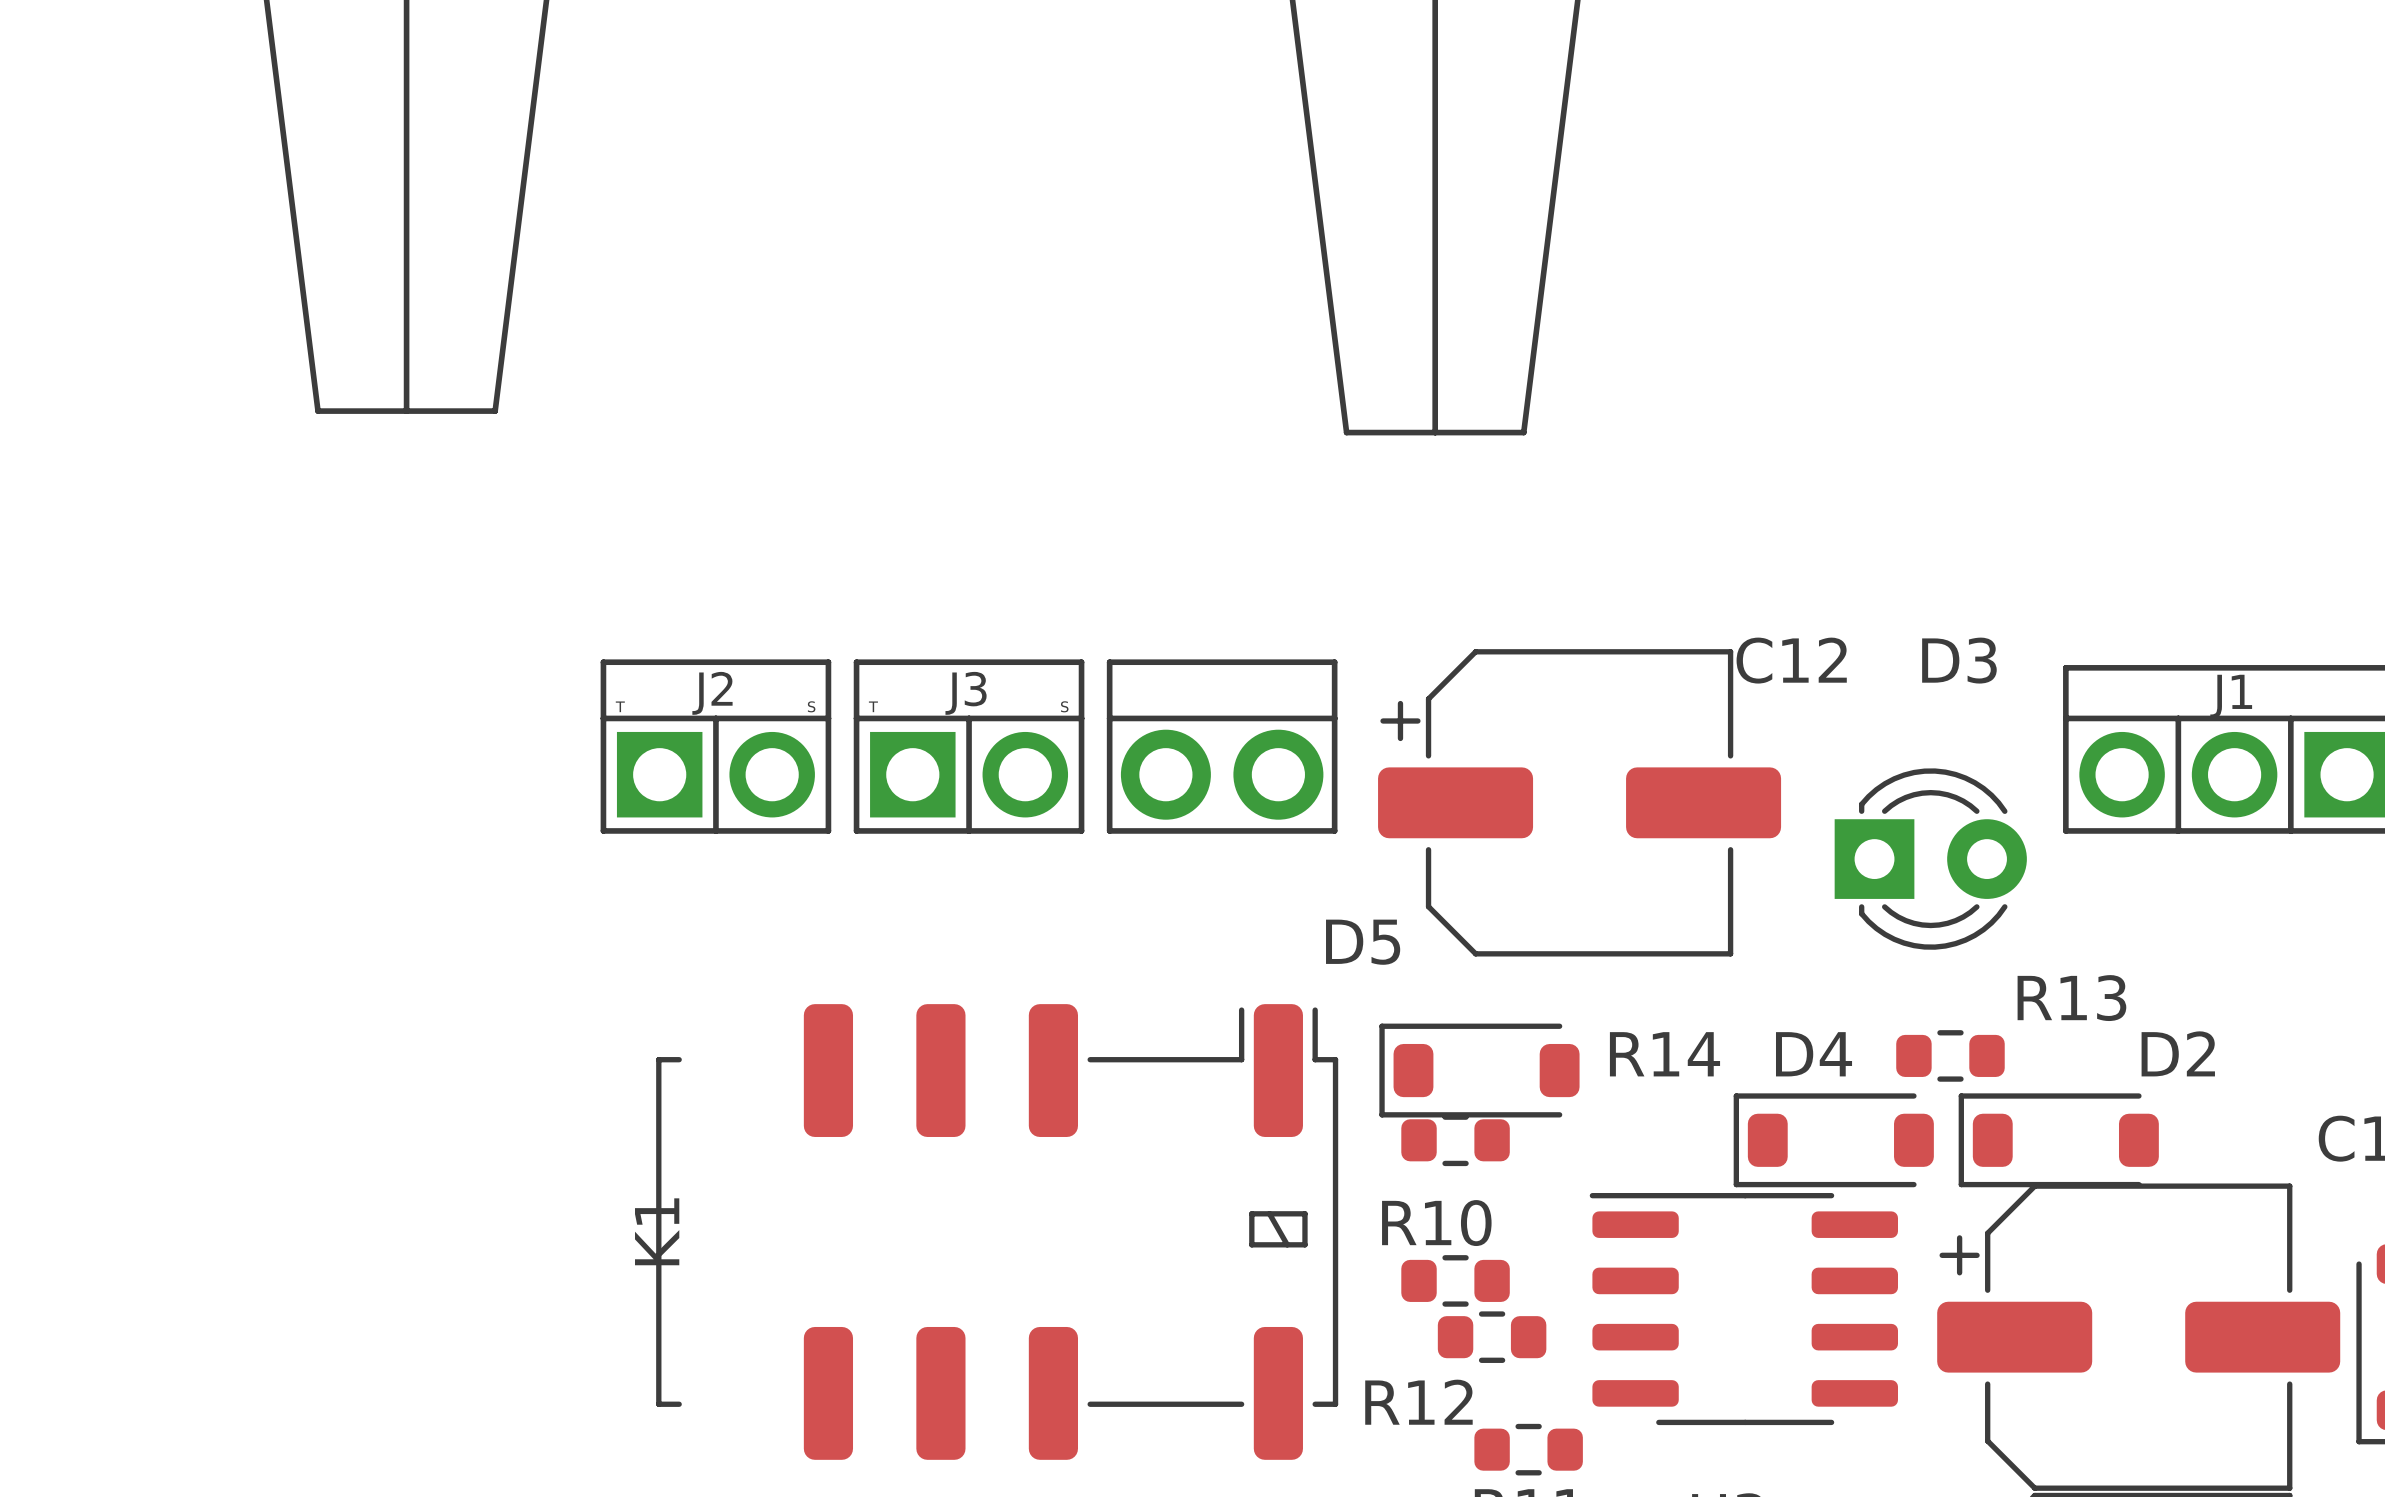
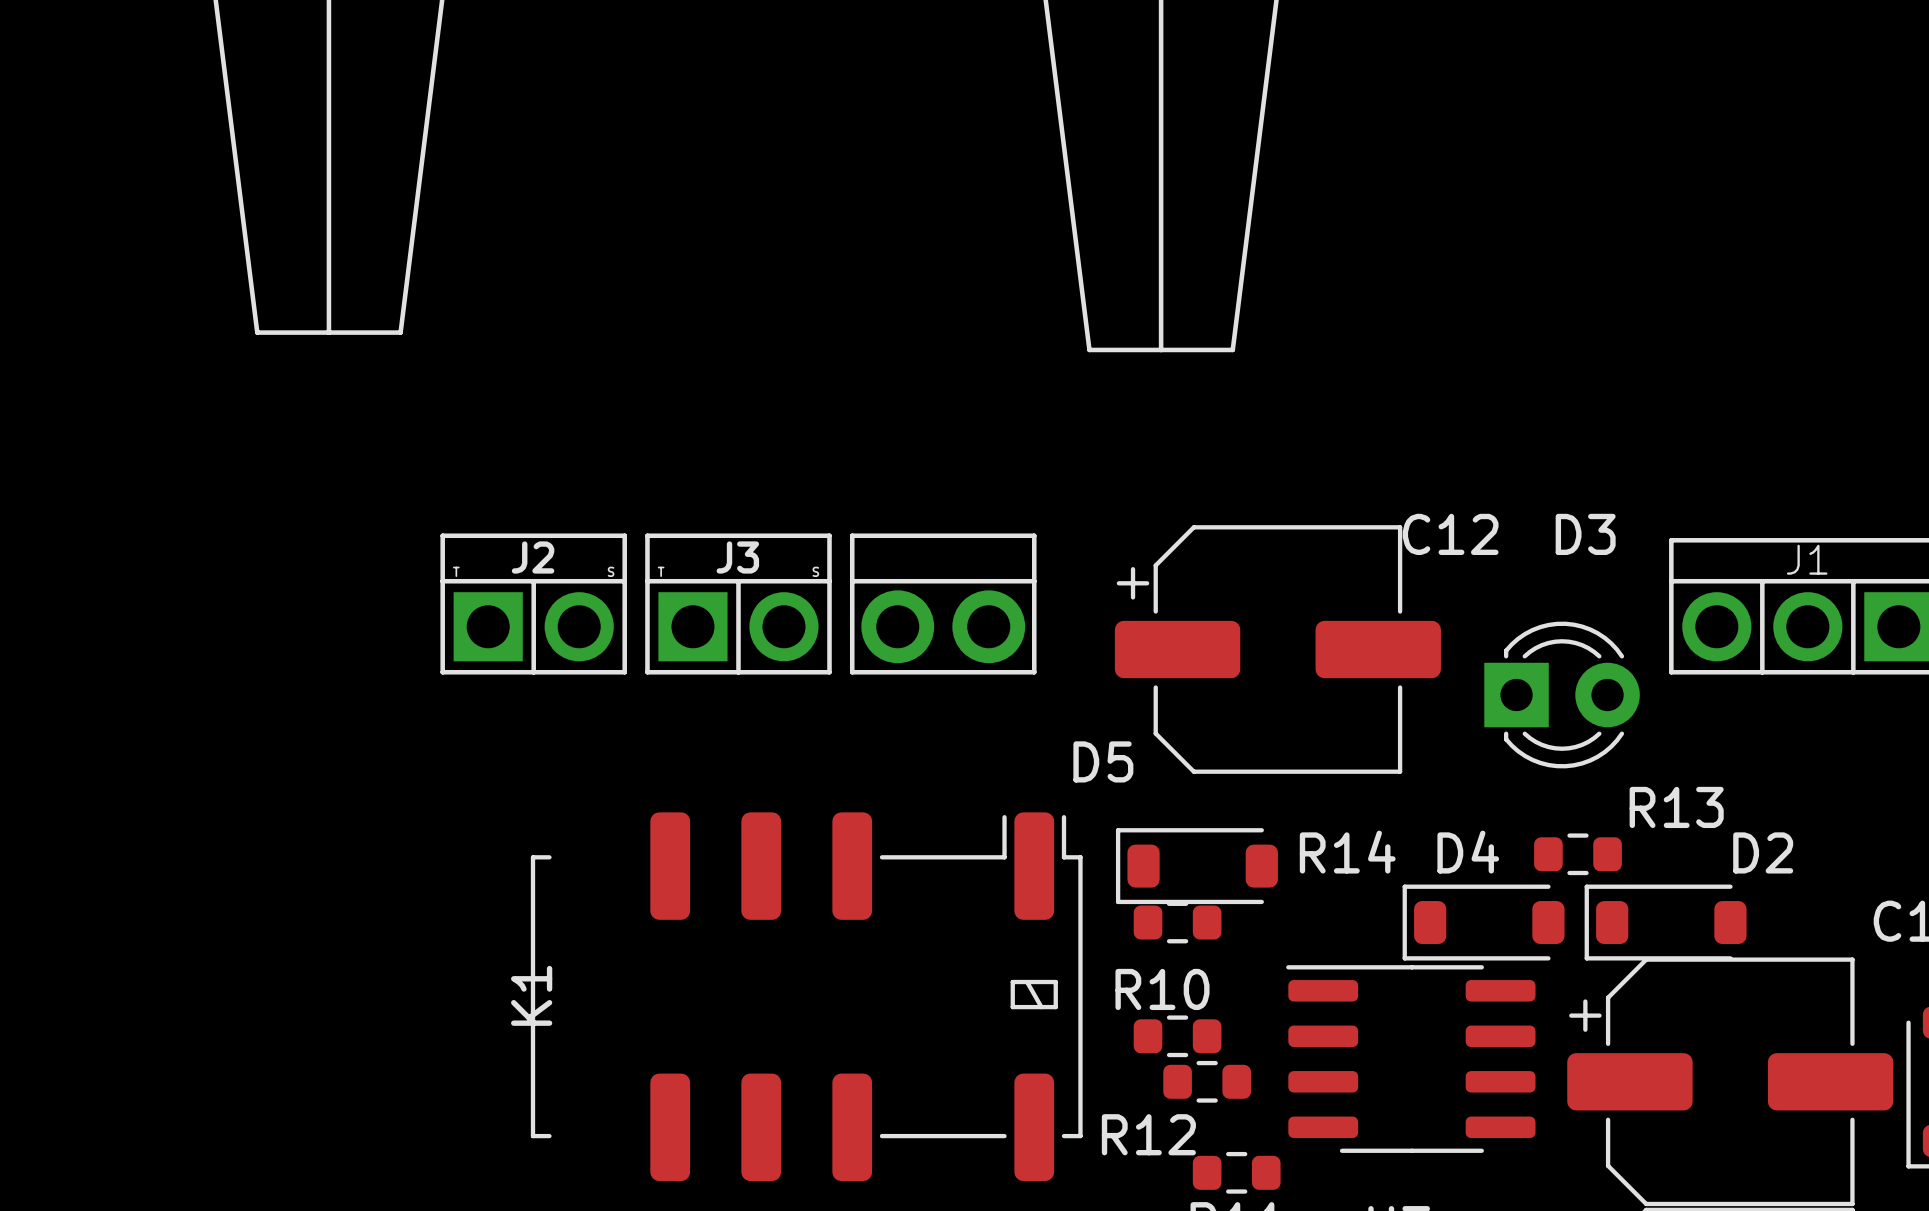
J2 position: (715, 746) -> (533, 604)
J3 position: (969, 746) -> (738, 604)
part position: (1222, 746) -> (943, 604)

